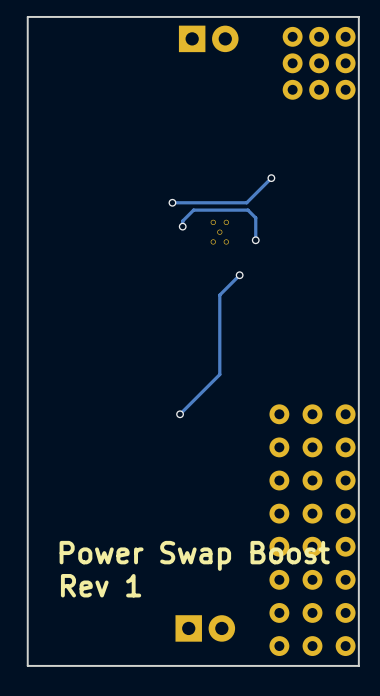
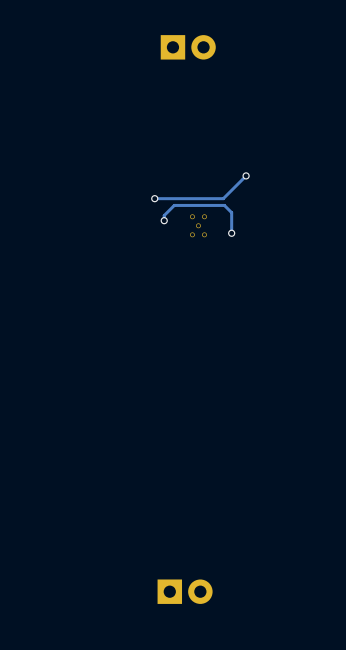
board edge: (358, 16) (358, 665) (27, 665) (27, 16) (358, 16) -> none
part: (292, 36) -> none
part: (319, 36) -> none
part: (345, 36) -> none
part: (292, 63) -> none
part: (319, 63) -> none
part: (345, 63) -> none
part: (292, 89) -> none
part: (319, 89) -> none
part: (345, 89) -> none
track: (239, 275) (219, 295) (219, 374) (180, 414) -> none
via: (239, 275) -> none
via: (180, 414) -> none
part: (279, 414) -> none
part: (312, 414) -> none
part: (345, 414) -> none
part: (279, 447) -> none
part: (312, 447) -> none
part: (345, 447) -> none
part: (279, 480) -> none
part: (312, 480) -> none
part: (345, 480) -> none
part: (279, 513) -> none
part: (312, 513) -> none
part: (345, 513) -> none
part: (279, 546) -> none
part: (312, 546) -> none
part: (345, 546) -> none
text: Power Swap Boost (194, 555) -> none
part: (279, 579) -> none
part: (312, 579) -> none
part: (345, 579) -> none
text: Rev 1 (101, 585) -> none
part: (279, 612) -> none
part: (312, 612) -> none
part: (345, 612) -> none
part: (279, 646) -> none
part: (312, 646) -> none
part: (345, 646) -> none

